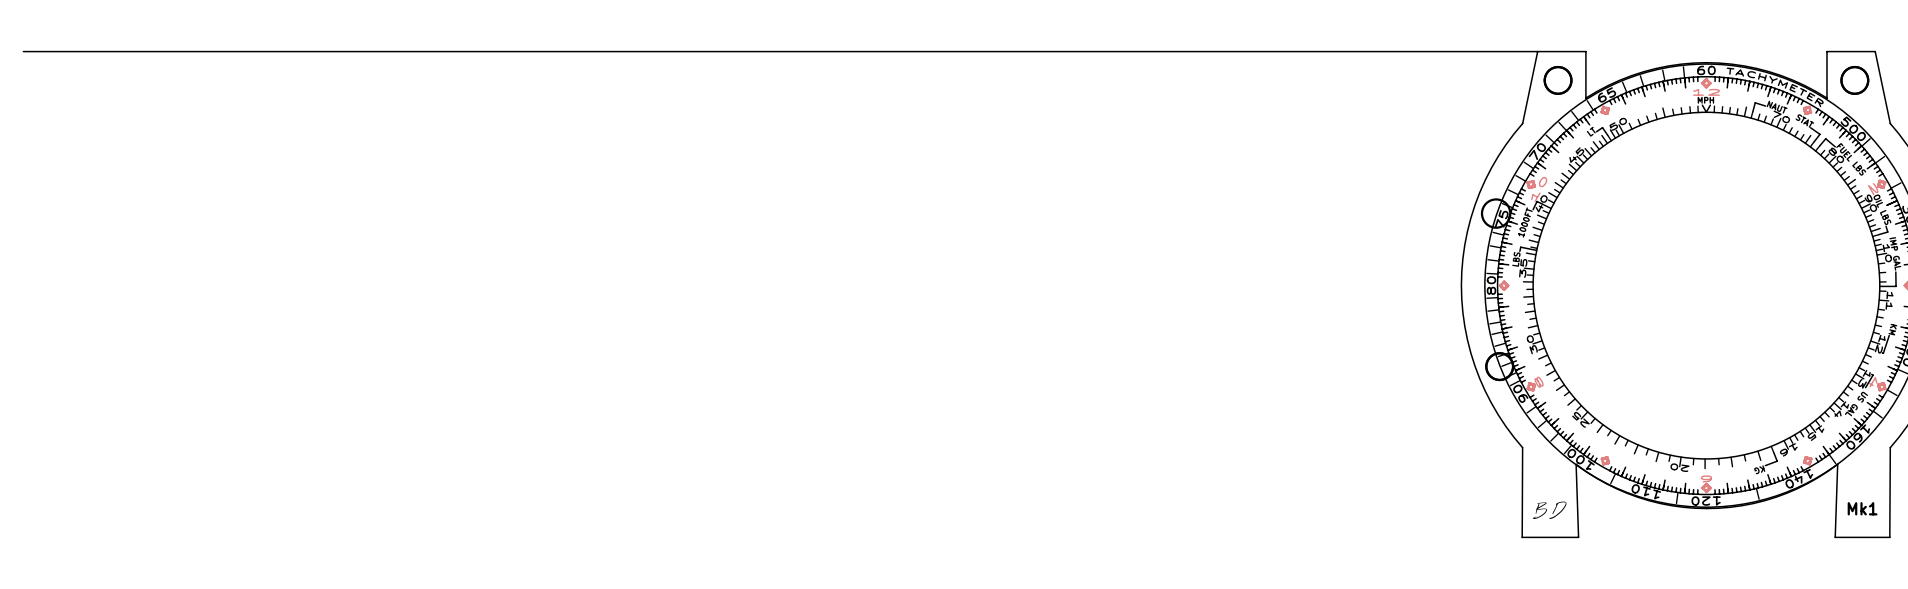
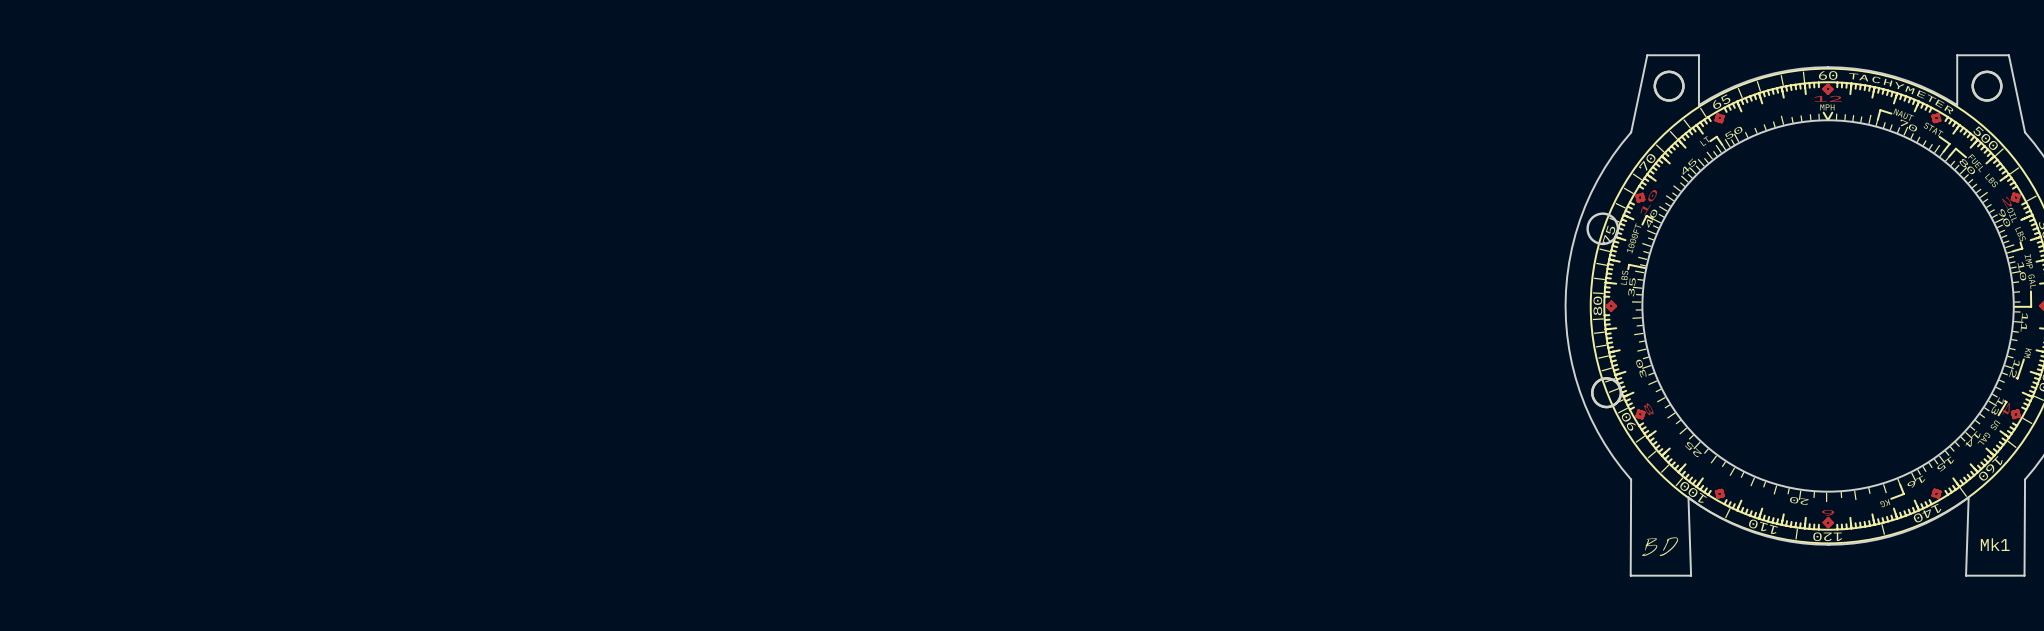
board edge: (23, 51) (1537, 51) -> none

